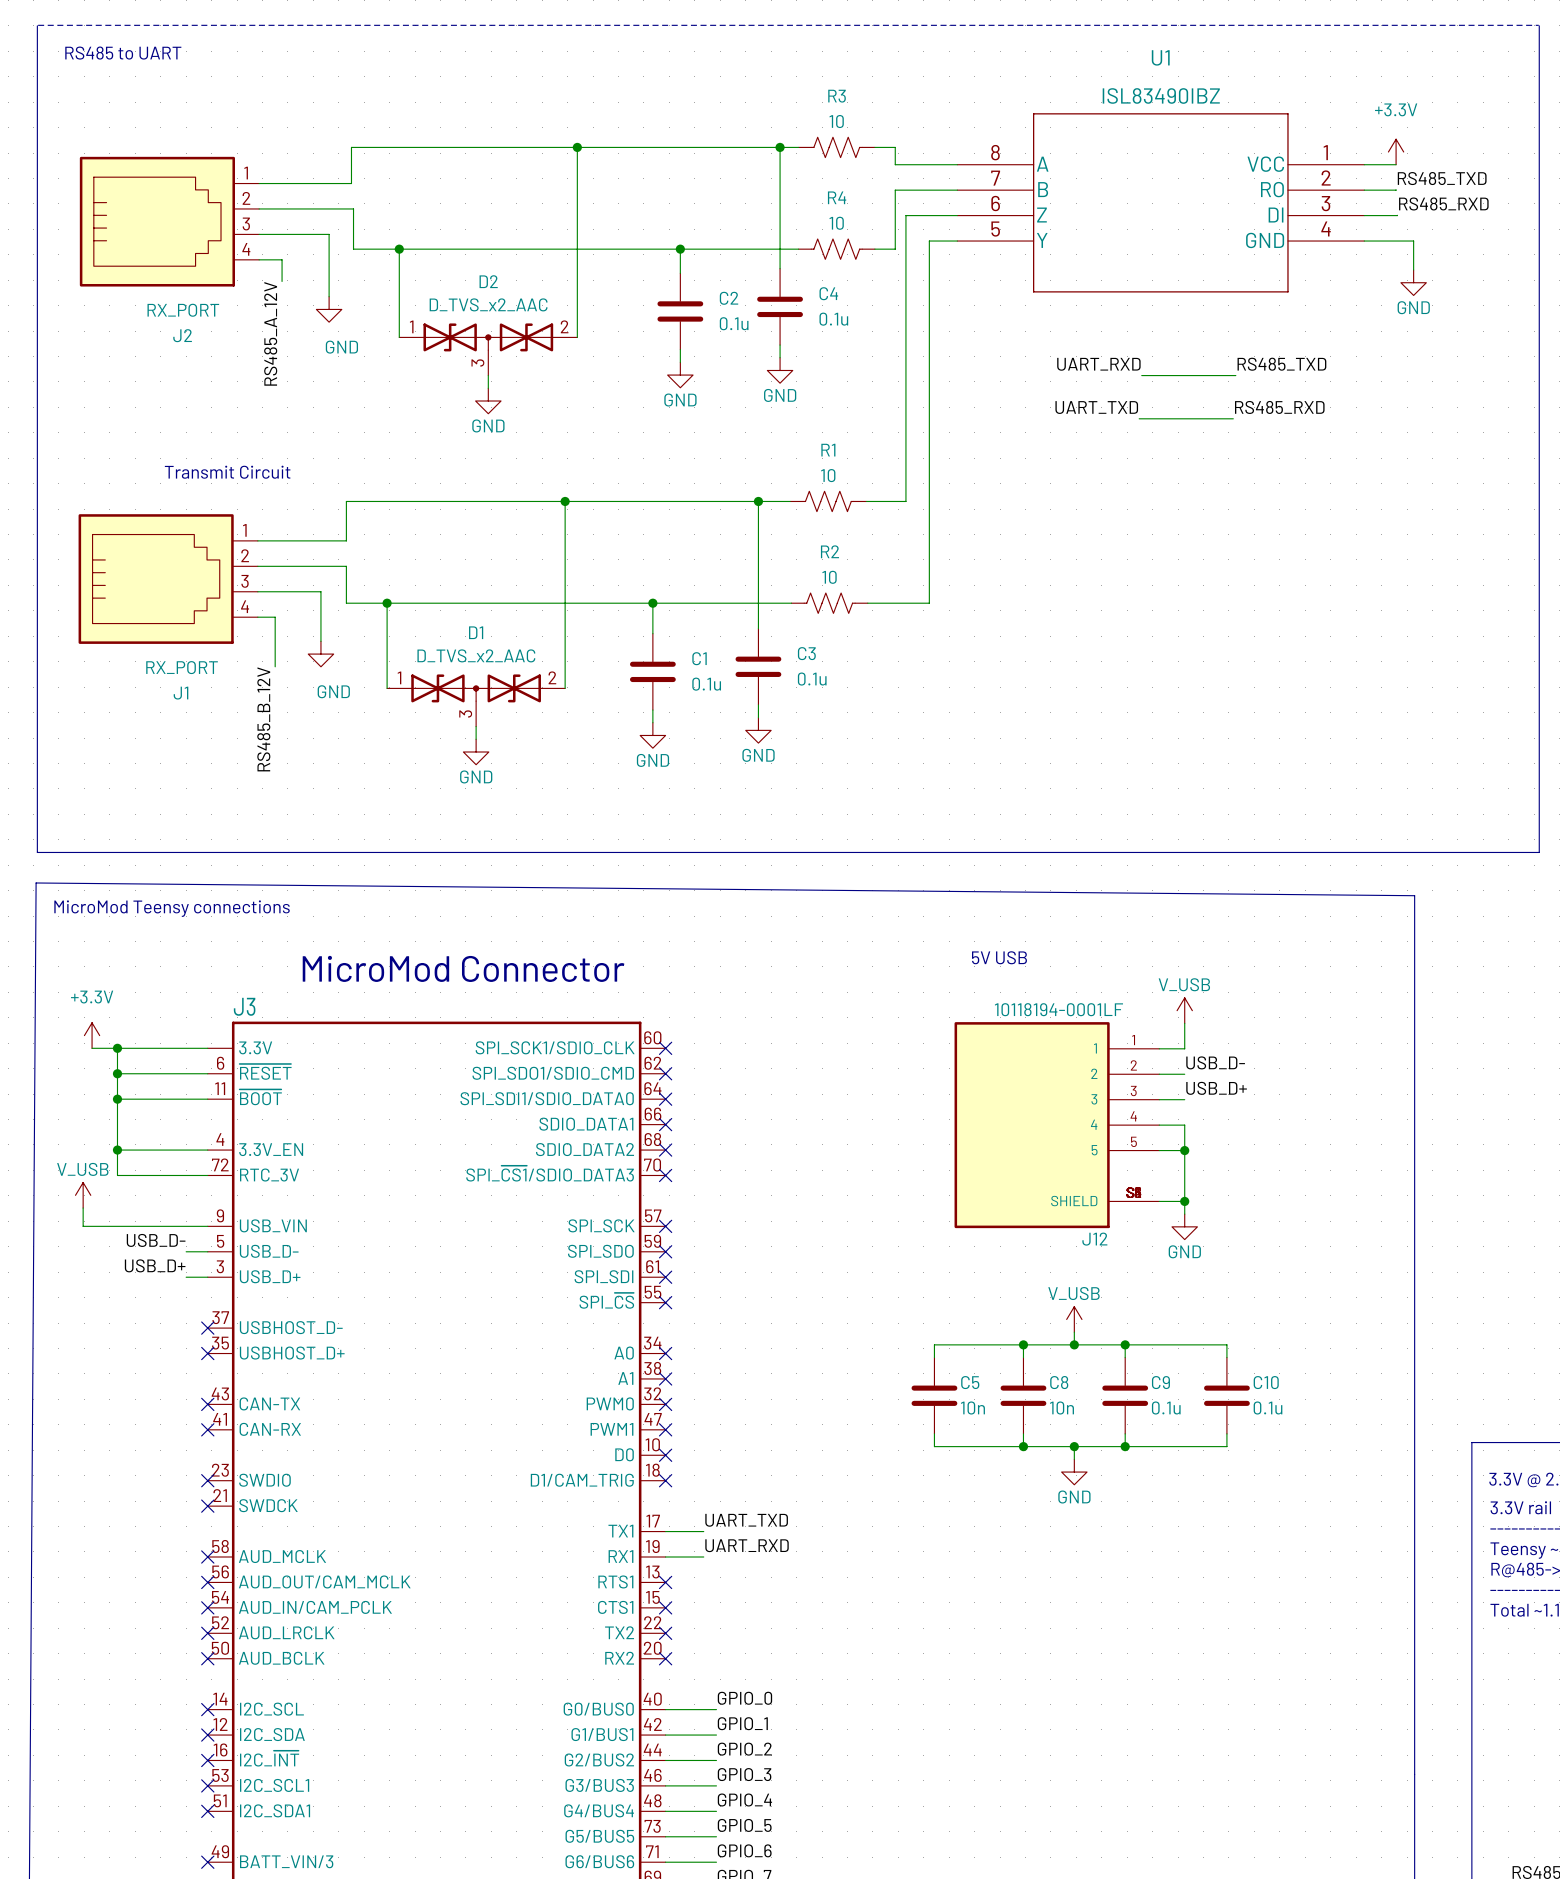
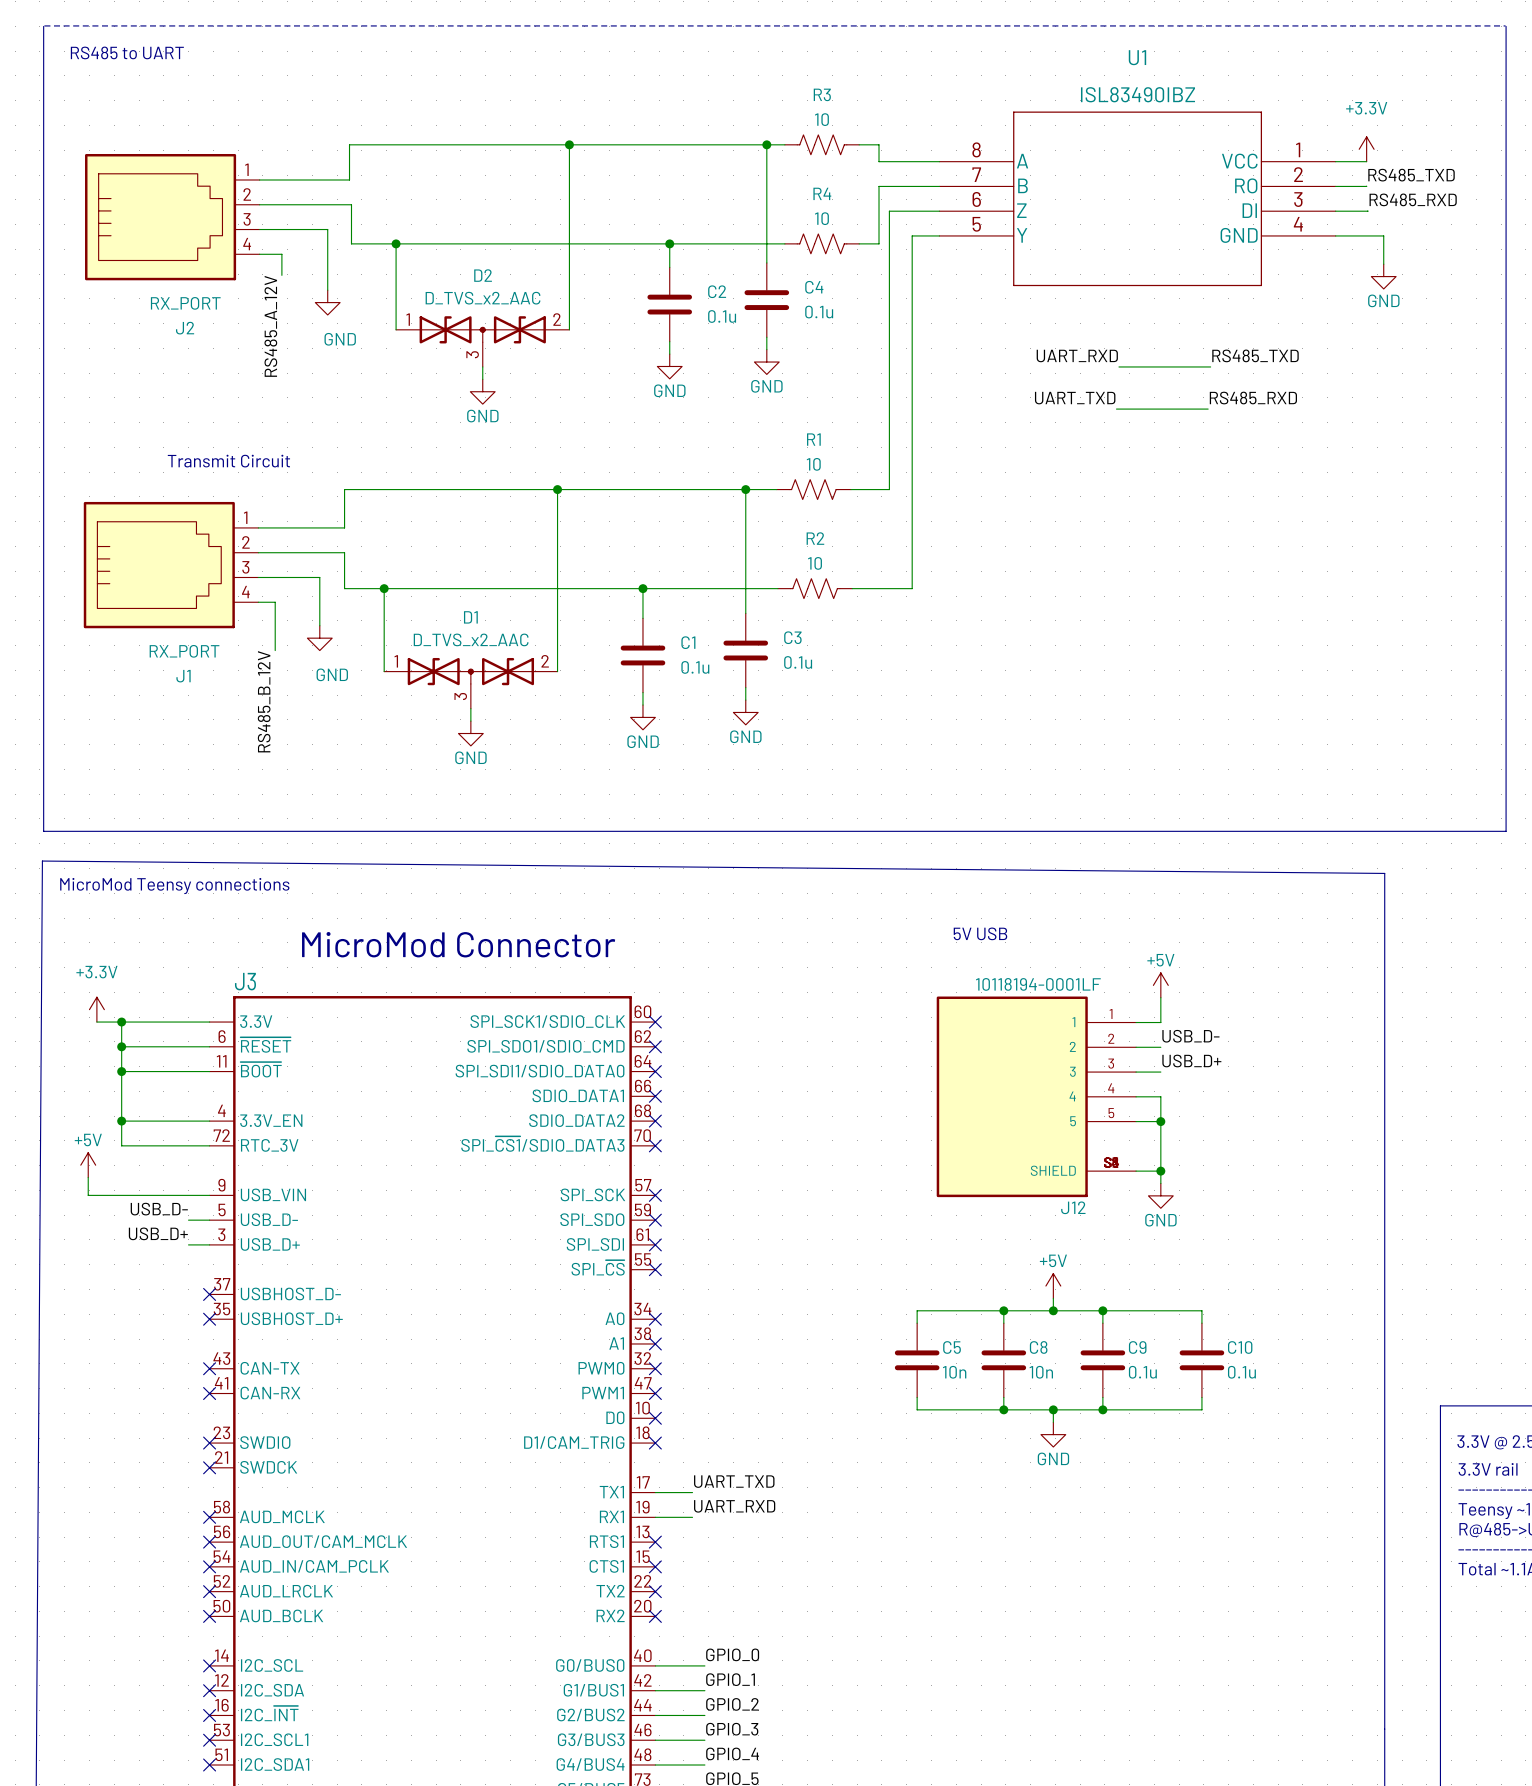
power symbol: V_USB (1184, 1010) -> +5V (1160, 985)
power symbol: V_USB (83, 1195) -> +5V (88, 1165)
power symbol: V_USB (1074, 1319) -> +5V (1053, 1286)

